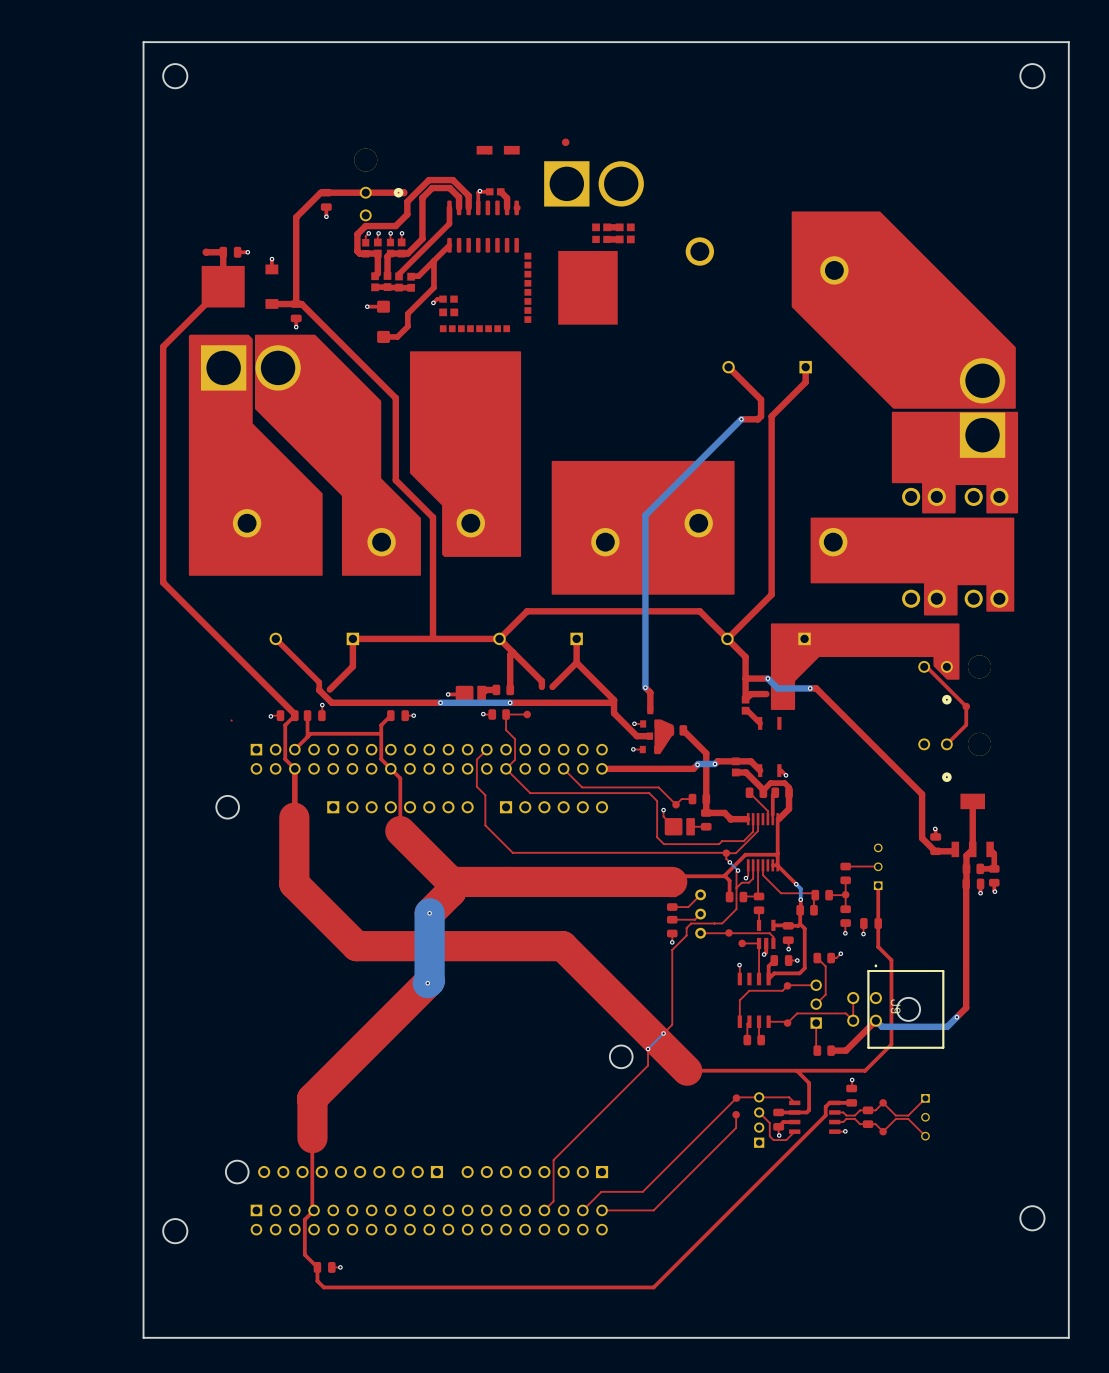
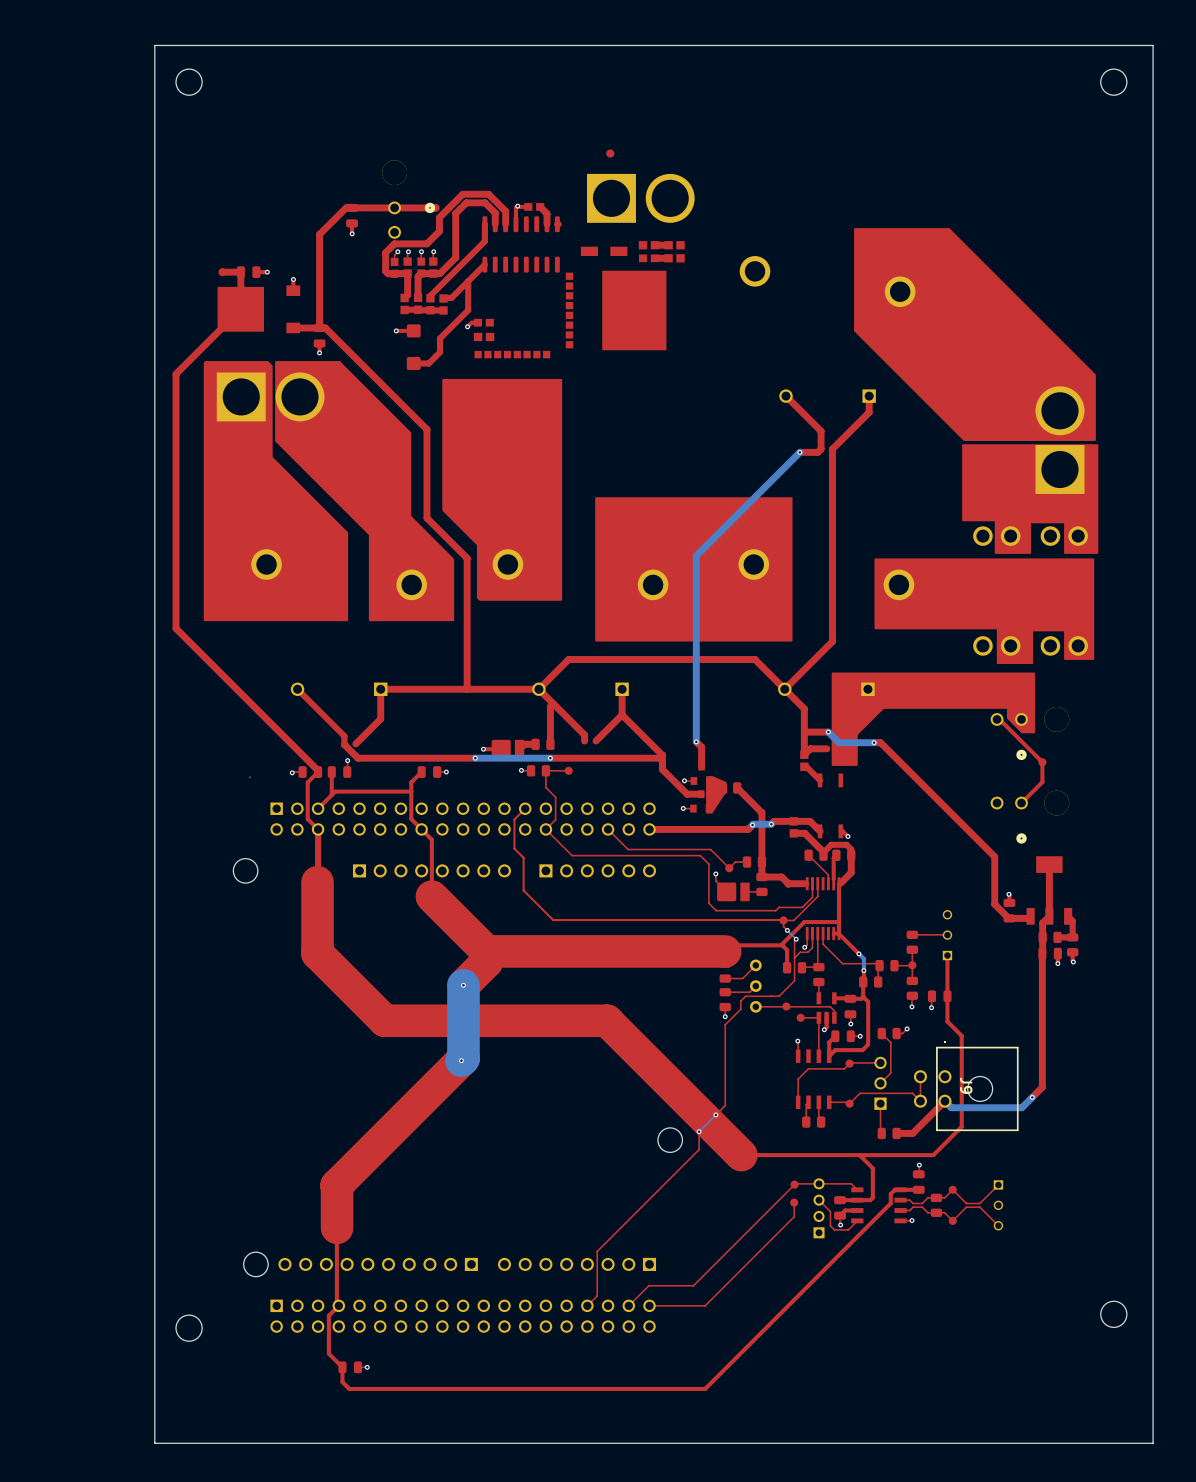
part position: (498, 150) -> (604, 251)

